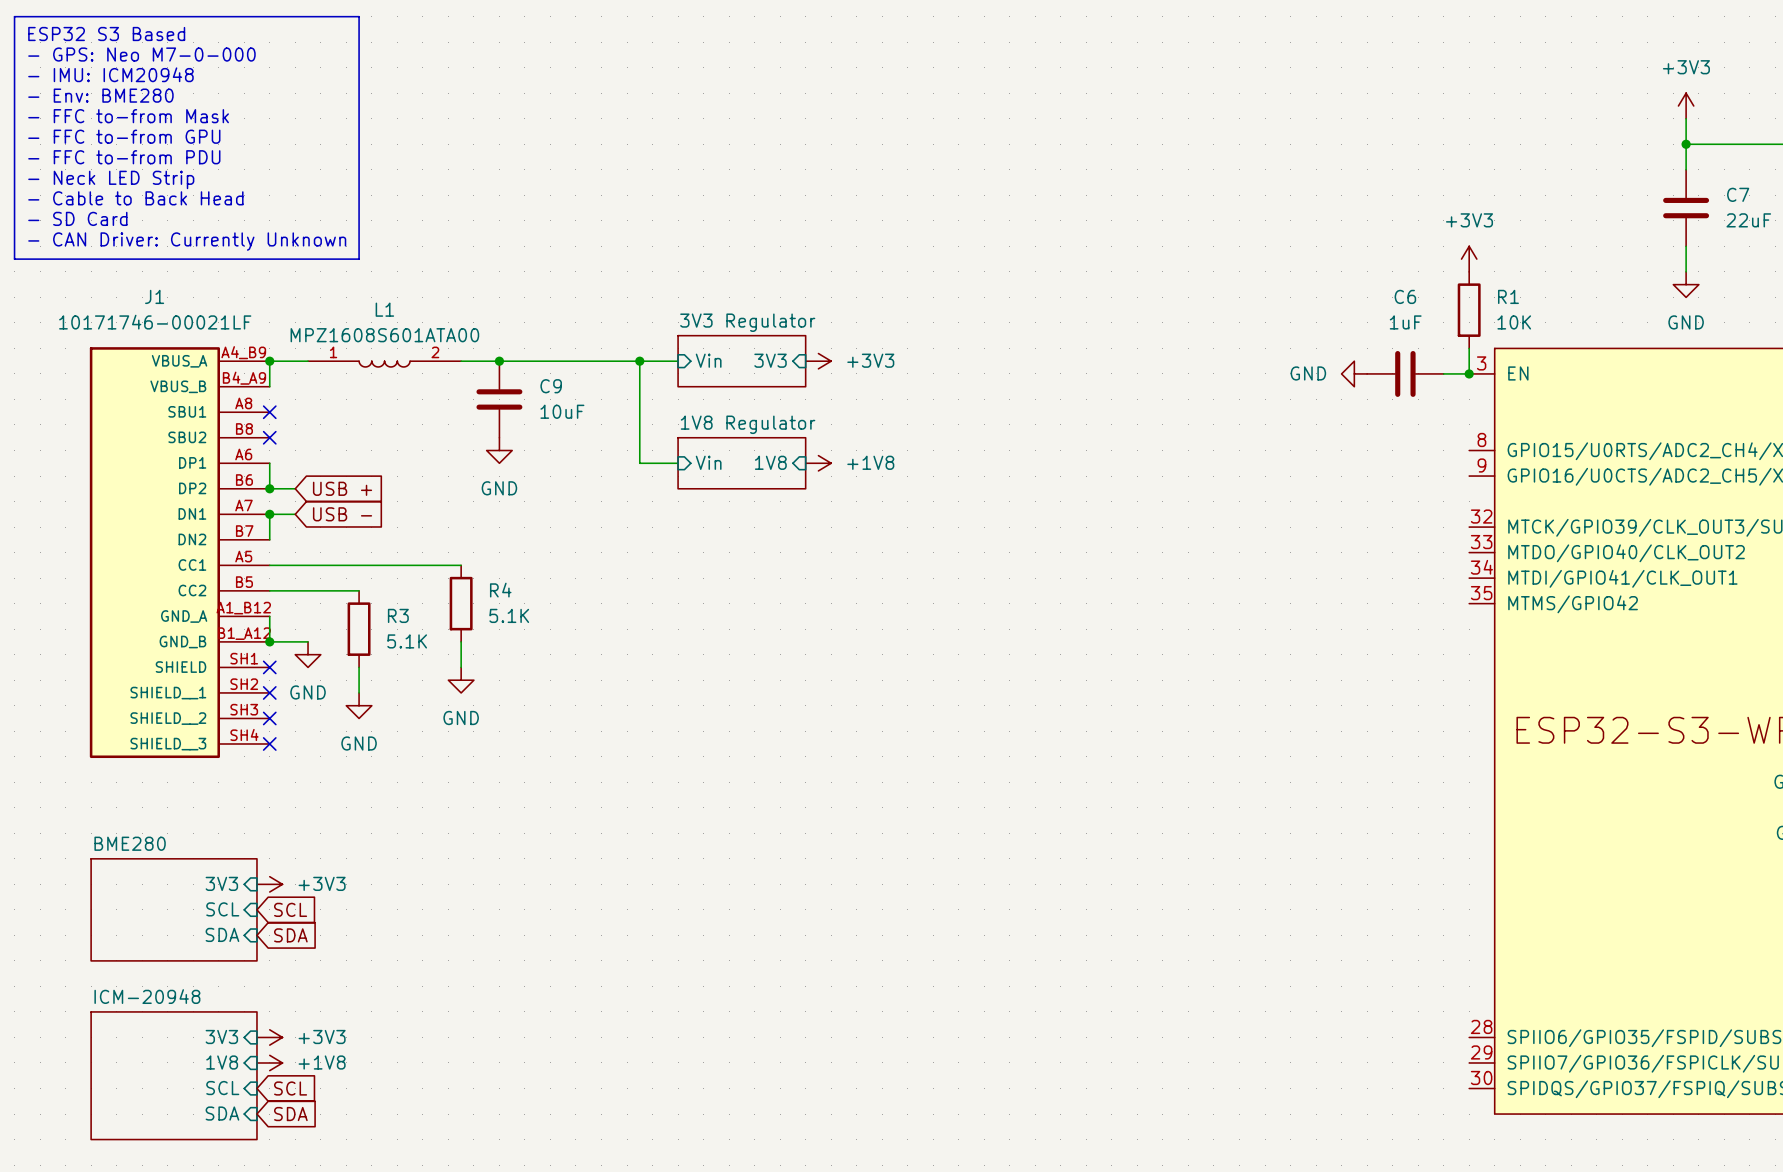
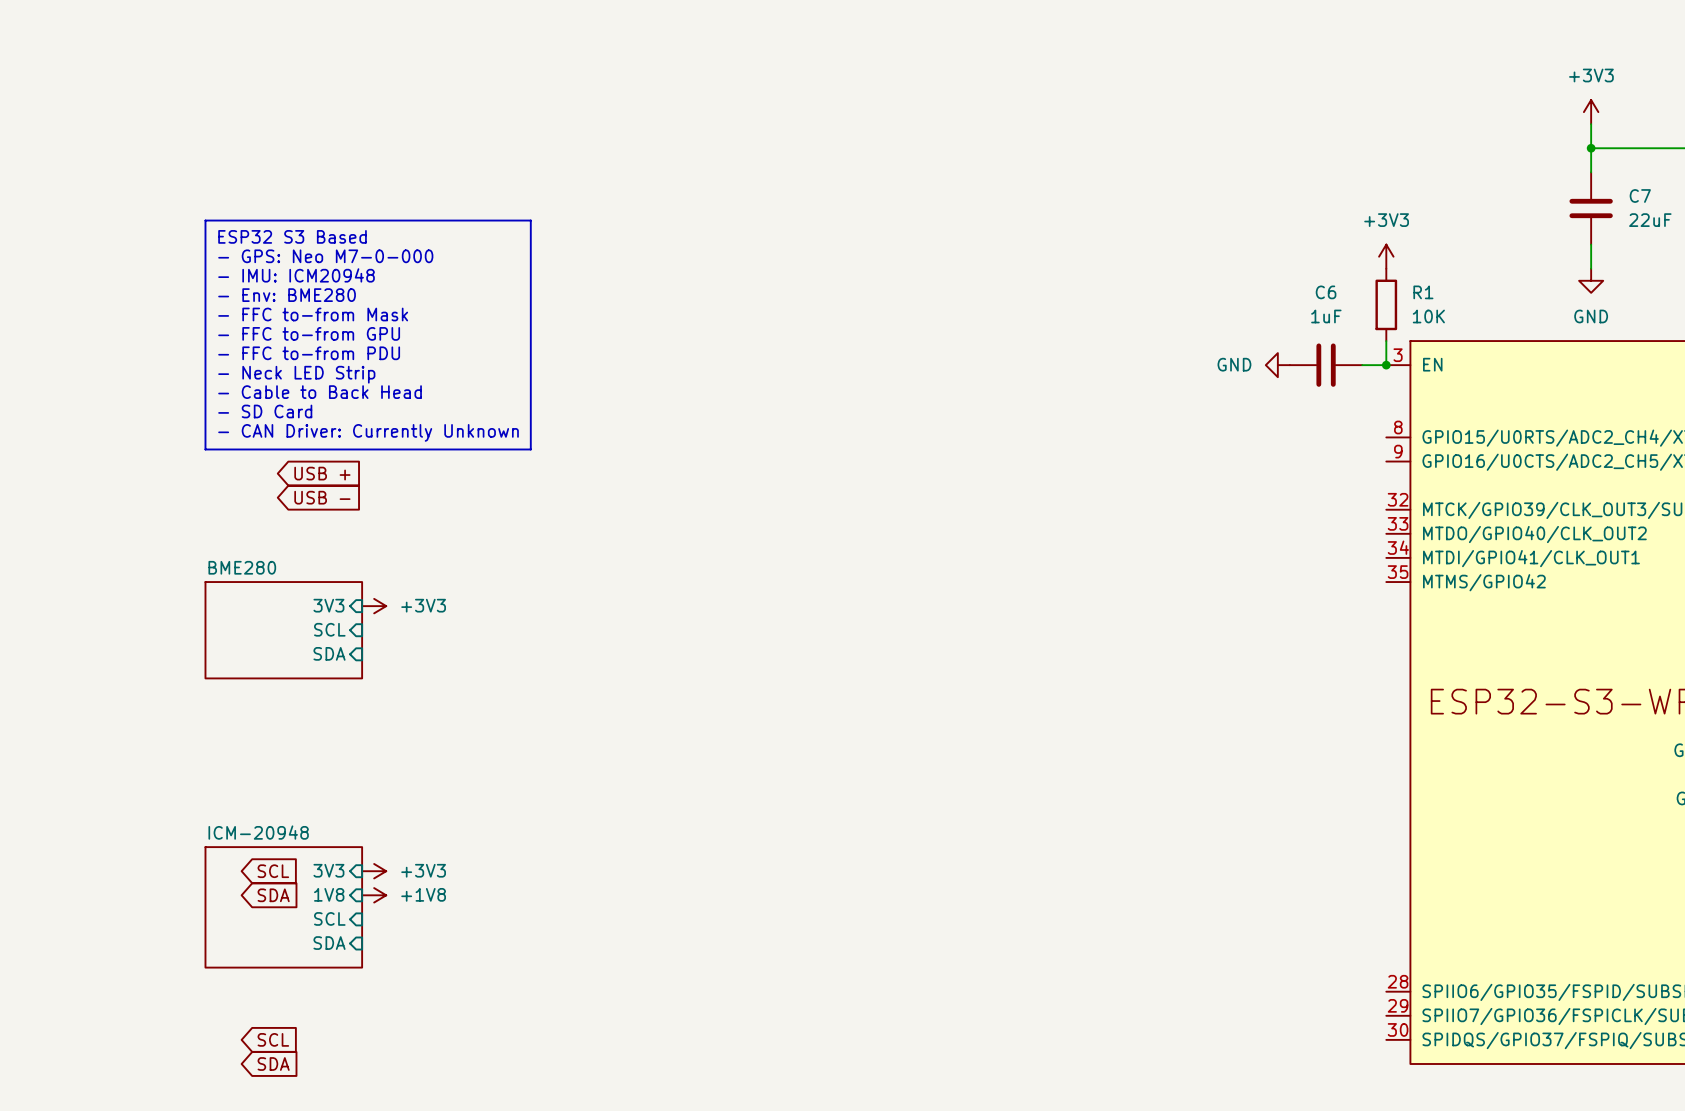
line: (14, 16) (359, 16) (359, 259) (14, 259) (14, 16) -> none
text: ESP32 S3 Based (106, 33) -> none
text: - GPS: Neo M7-0-000 (141, 54) -> none
text: - IMU: ICM20948 (110, 74) -> none
text: - Env: BME280 (100, 95) -> none
text: - FFC to-from Mask (128, 116) -> none
text: - FFC to-from GPU (124, 136) -> none
text: - FFC to-from PDU (124, 157) -> none
text: - Neck LED Strip (111, 179) -> none
text: - Cable to Back Head (135, 198) -> none
text: - SD Card (77, 218) -> none
line: none -> (205, 220) (530, 220) (530, 449) (205, 449) (205, 220)
text: none -> ESP32 S3 Based (292, 236)
text: - CAN Driver: Currently Unknown (187, 241) -> none
text: none -> - GPS: Neo M7-0-000 (325, 256)
text: none -> - IMU: ICM20948 (296, 275)
text: none -> - Env: BME280 (287, 295)
text: none -> - FFC to-from Mask (313, 314)
text: none -> - FFC to-from GPU (309, 333)
sheet pin: Vin (708, 360) -> none
sheet pin: 3V3 (770, 360) -> none
junction: (269, 361) -> none
wire: (308, 361) (269, 361) (269, 386) -> none
text: none -> - FFC to-from PDU (309, 353)
wire: (461, 361) (678, 361) -> none
junction: (499, 361) -> none
wire: (639, 361) (639, 463) (678, 463) -> none
junction: (639, 361) -> none
sheet 3V3 Regulator: (741, 361) -> none
power symbol: +3V3 (818, 361) -> none
L1: MPZ1608S601ATA00 (384, 364) -> none
text: none -> - Neck LED Strip (296, 374)
C9: 10uF (499, 399) -> none
text: none -> - Cable to Back Head (320, 392)
no-connect mark: (269, 412) -> none
text: none -> - SD Card (265, 411)
no-connect mark: (269, 437) -> none
text: none -> - CAN Driver: Currently Unknown (368, 432)
power symbol: GND (499, 450) -> none
sheet pin: Vin (708, 462) -> none
sheet pin: 1V8 (770, 462) -> none
wire: (269, 463) (269, 488) (295, 488) -> none
sheet 1V8 Regulator: (741, 463) -> none
power symbol: +1V8 (818, 463) -> none
junction: (269, 488) -> none
junction: (269, 514) -> none
wire: (295, 514) (269, 514) (269, 539) -> none
J1: 10171746-00021LF (179, 552) -> none
wire: (269, 565) (461, 565) -> none
wire: (269, 590) (359, 590) -> none
R4: 5.1K (461, 603) -> none
wire: (269, 616) (269, 641) (308, 641) -> none
sheet pin: none -> 3V3 (328, 605)
R3: 5.1K (359, 629) -> none
power symbol: none -> +3V3 (374, 606)
junction: (269, 641) -> none
wire: (461, 641) (461, 667) -> none
power symbol: GND (308, 654) -> none
sheet pin: none -> SCL (329, 629)
no-connect mark: (269, 667) -> none
wire: (359, 667) (359, 692) -> none
sheet pin: none -> SDA (329, 653)
power symbol: GND (461, 680) -> none
no-connect mark: (269, 692) -> none
power symbol: GND (359, 705) -> none
no-connect mark: (269, 718) -> none
no-connect mark: (269, 743) -> none
sheet pin: 3V3 (221, 883) -> none
power symbol: +3V3 (269, 884) -> none
sheet BME280 position: (174, 909) -> (283, 630)
sheet pin: SCL (222, 909) -> none
sheet pin: none -> 3V3 (328, 870)
power symbol: none -> +3V3 (374, 871)
sheet pin: SDA (222, 934) -> none
sheet pin: none -> SCL (329, 918)
sheet pin: none -> SDA (329, 943)
sheet pin: 3V3 (221, 1036) -> none
power symbol: +3V3 (269, 1037) -> none
sheet pin position: 1V8 (222, 1062) -> 1V8 (329, 894)
power symbol position: +1V8 (269, 1062) -> +1V8 (374, 895)
sheet ICM-20948 position: (174, 1075) -> (283, 907)
sheet pin: SCL (222, 1088) -> none
sheet pin: SDA (222, 1113) -> none

